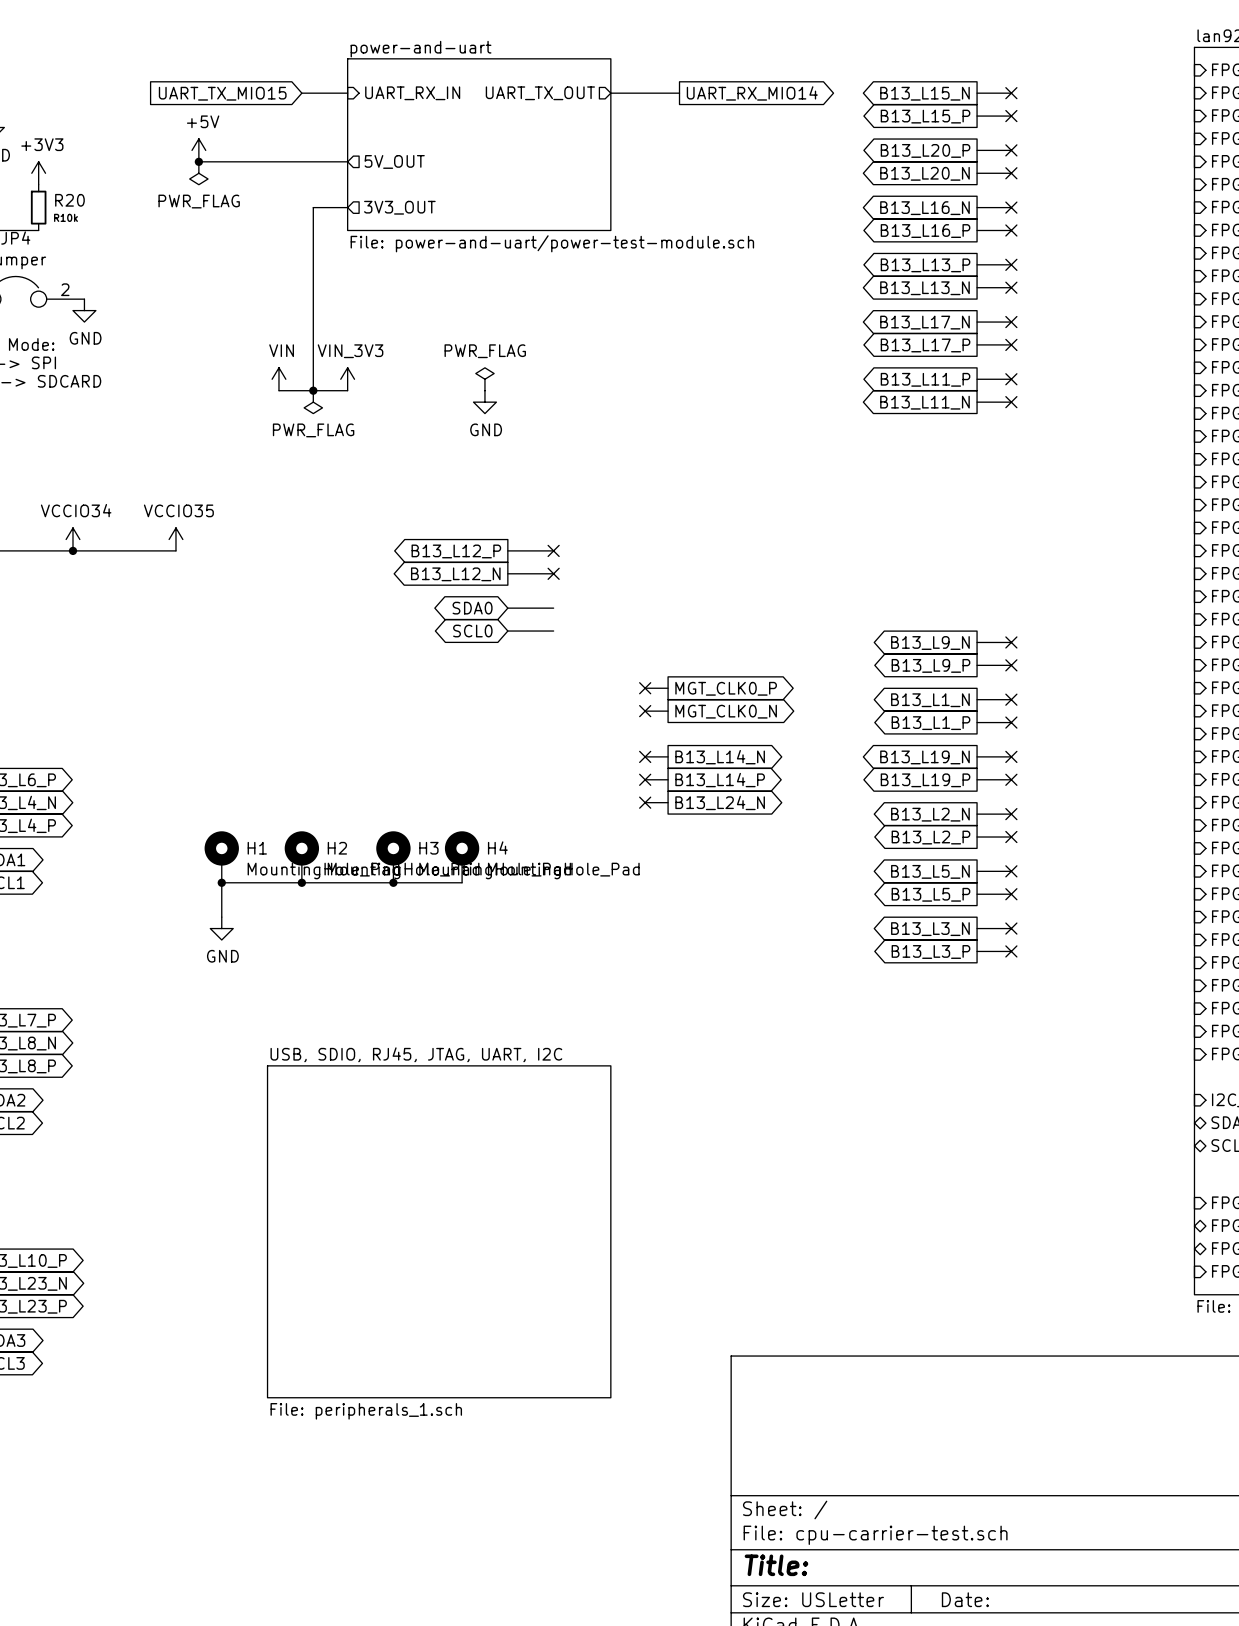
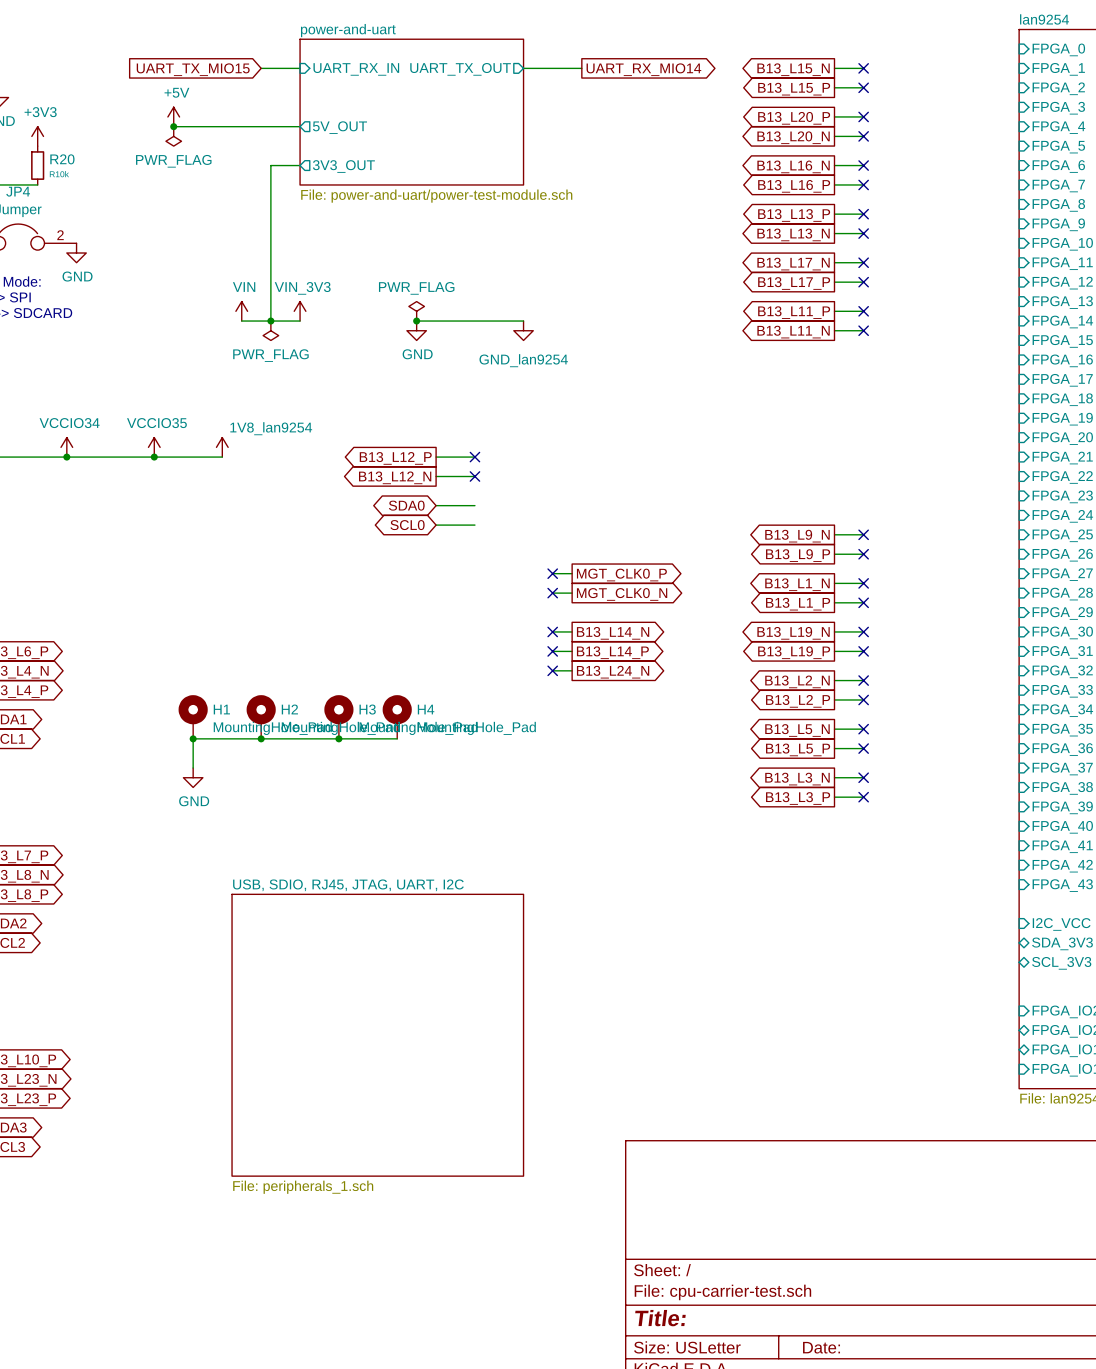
wire: none -> (416, 321) (523, 321)
junction: none -> (416, 321)
power symbol: none -> (523, 330)
power symbol: none -> (222, 447)
wire: none -> (154, 457) (222, 457)
junction: none -> (154, 457)

